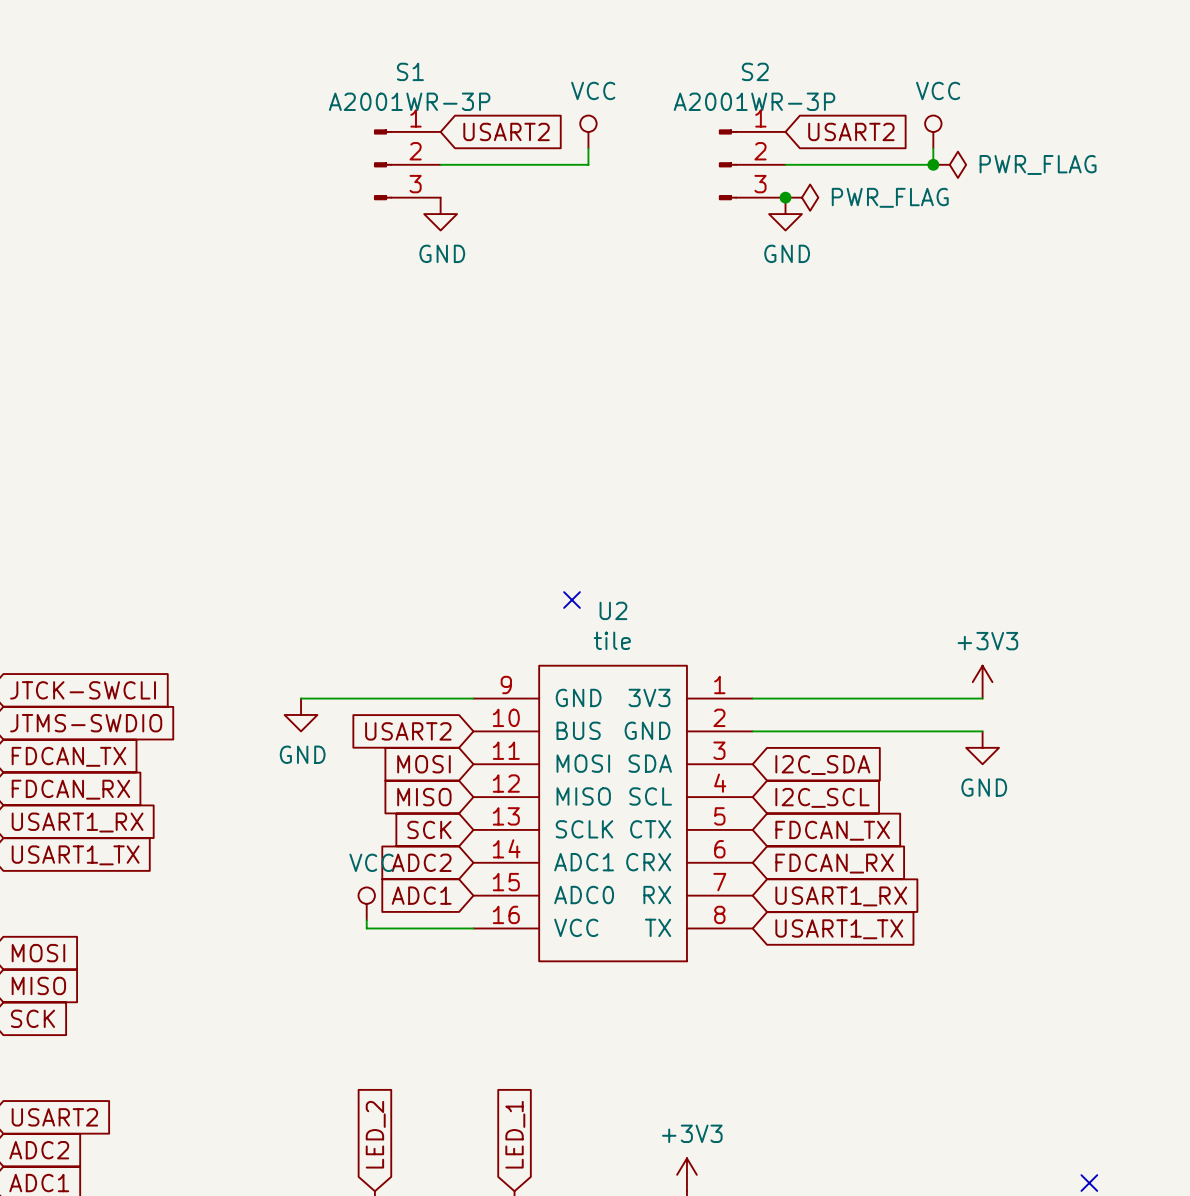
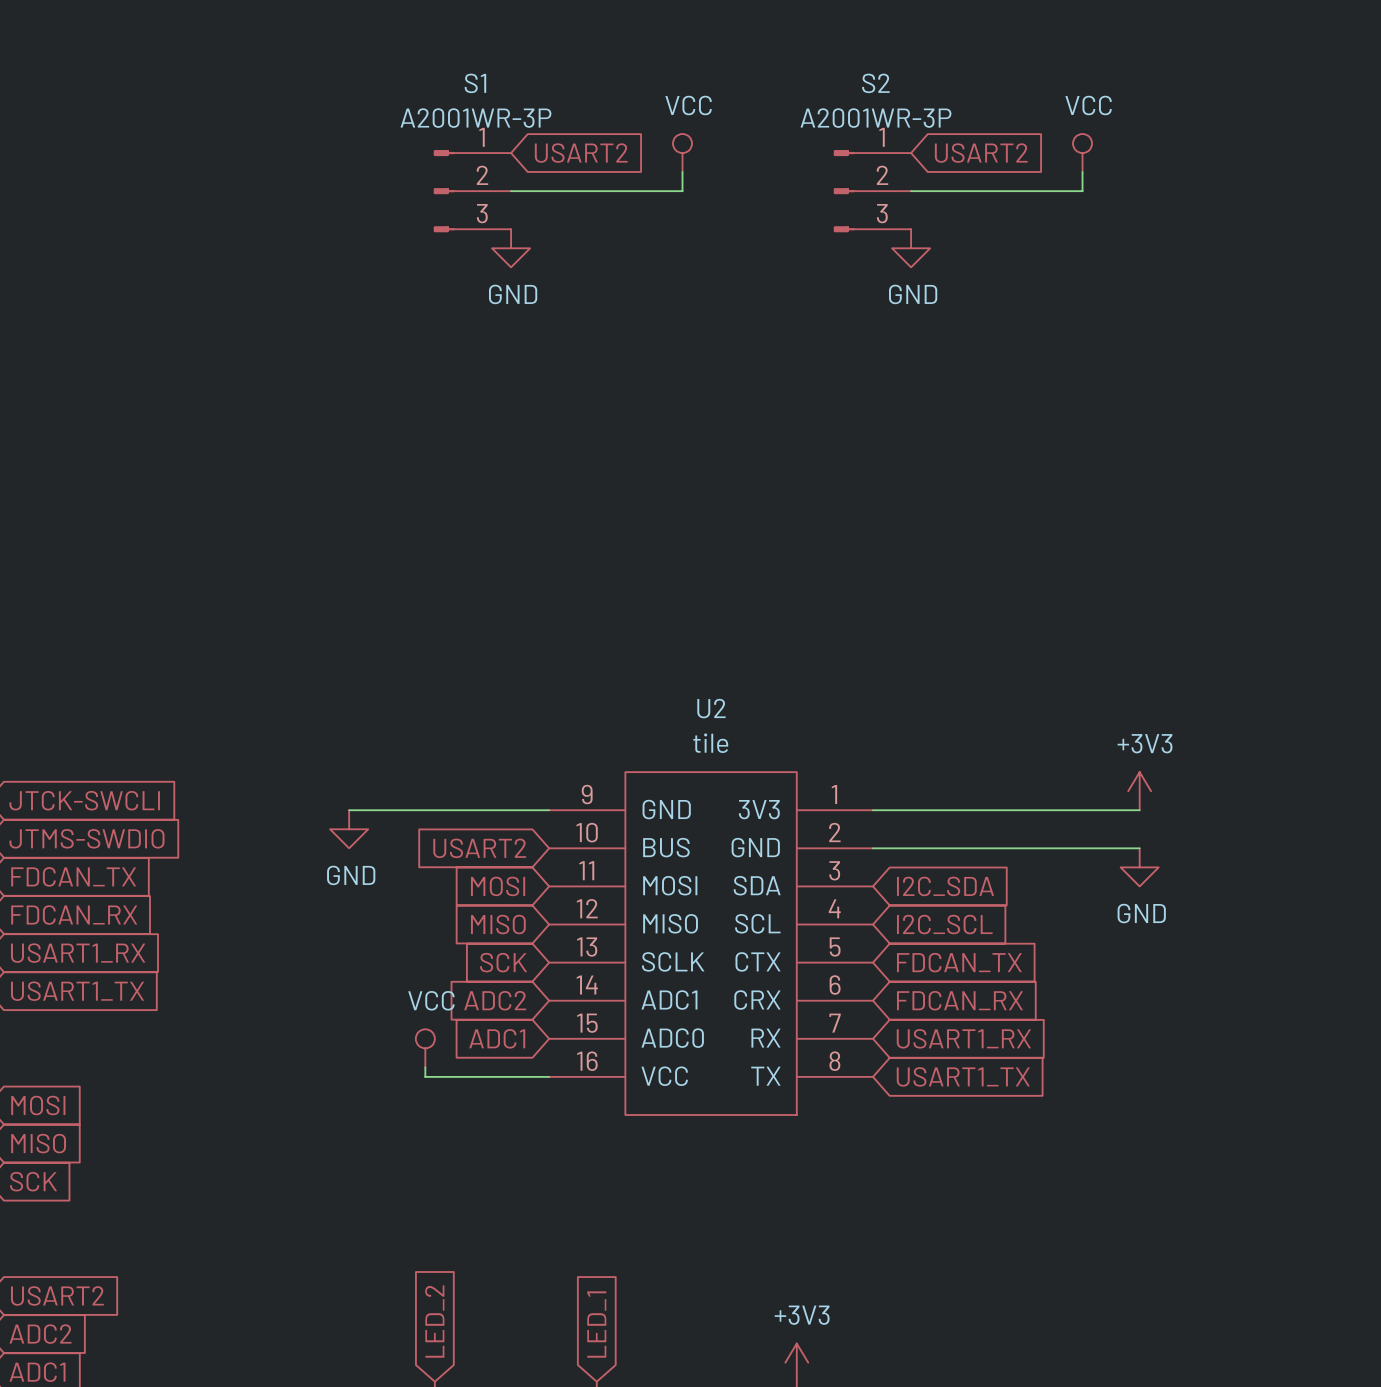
junction: (933, 164) -> none
power symbol: PWR_FLAG (949, 164) -> none
junction: (785, 197) -> none
power symbol: PWR_FLAG (801, 197) -> none
no-connect mark: (572, 600) -> none
no-connect mark: (1089, 1183) -> none

